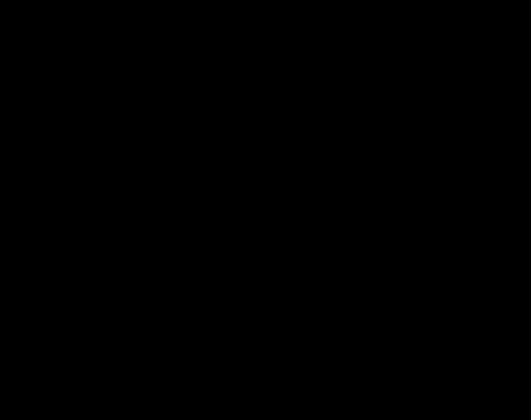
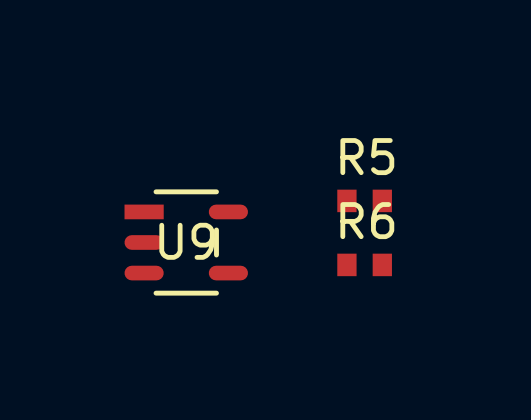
R5: none -> (364, 200)
U9: none -> (186, 242)
R6: none -> (364, 264)

